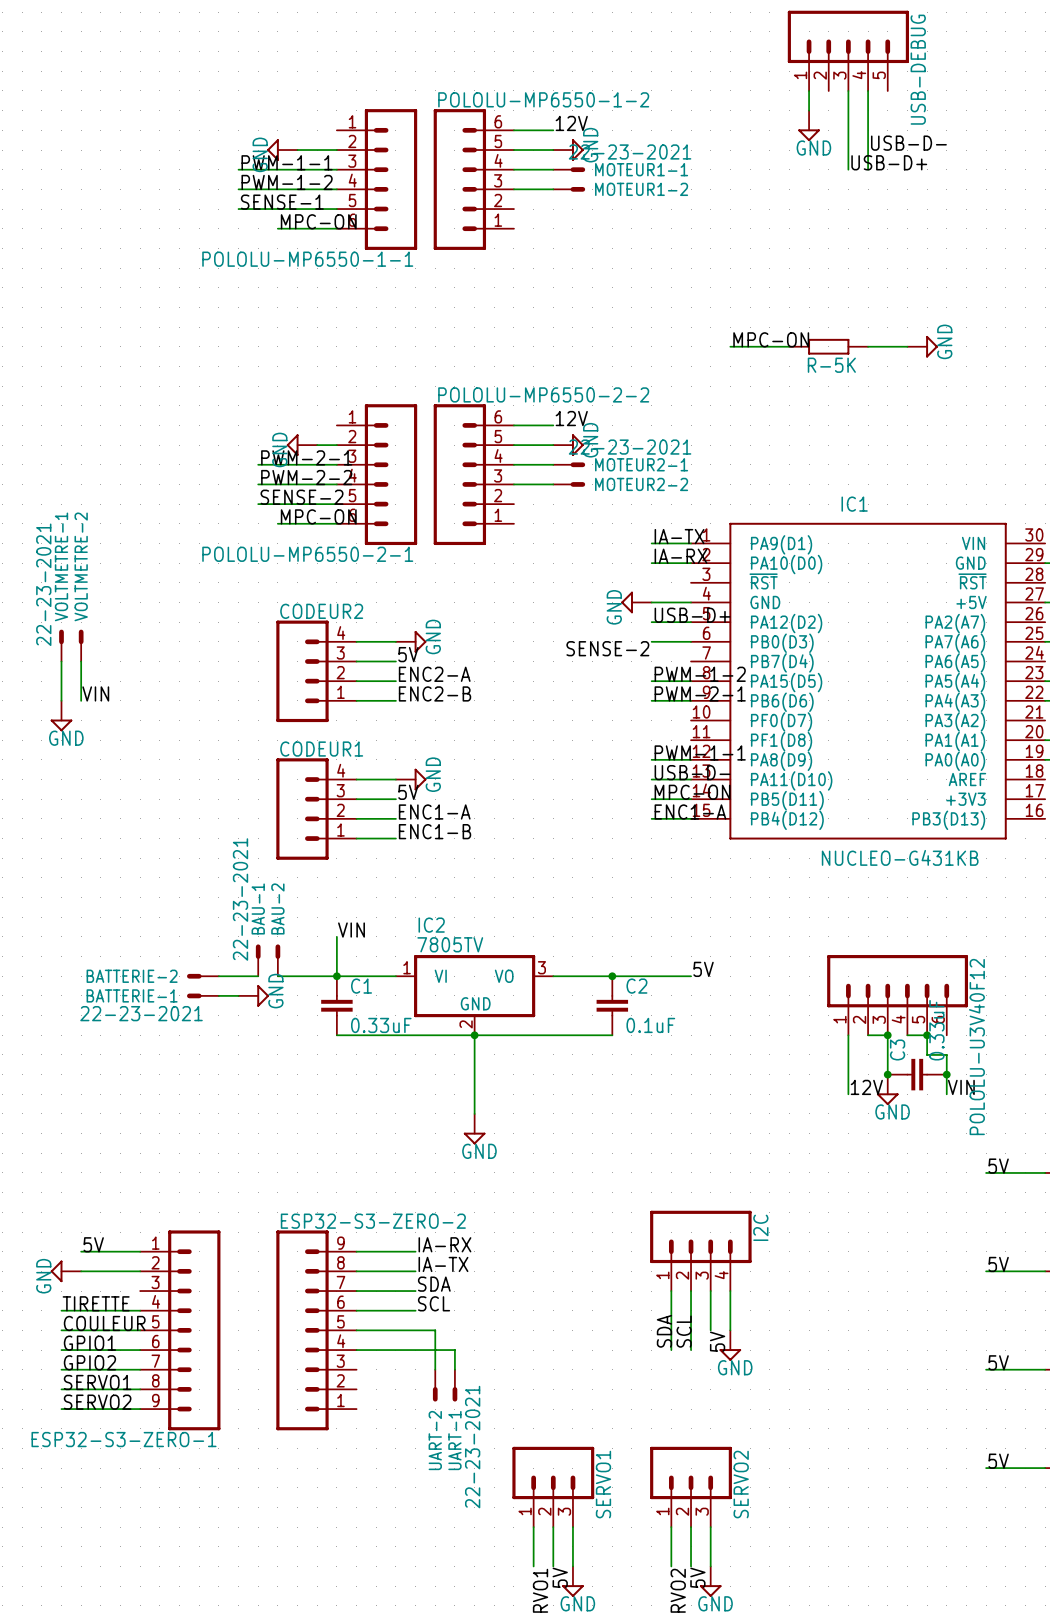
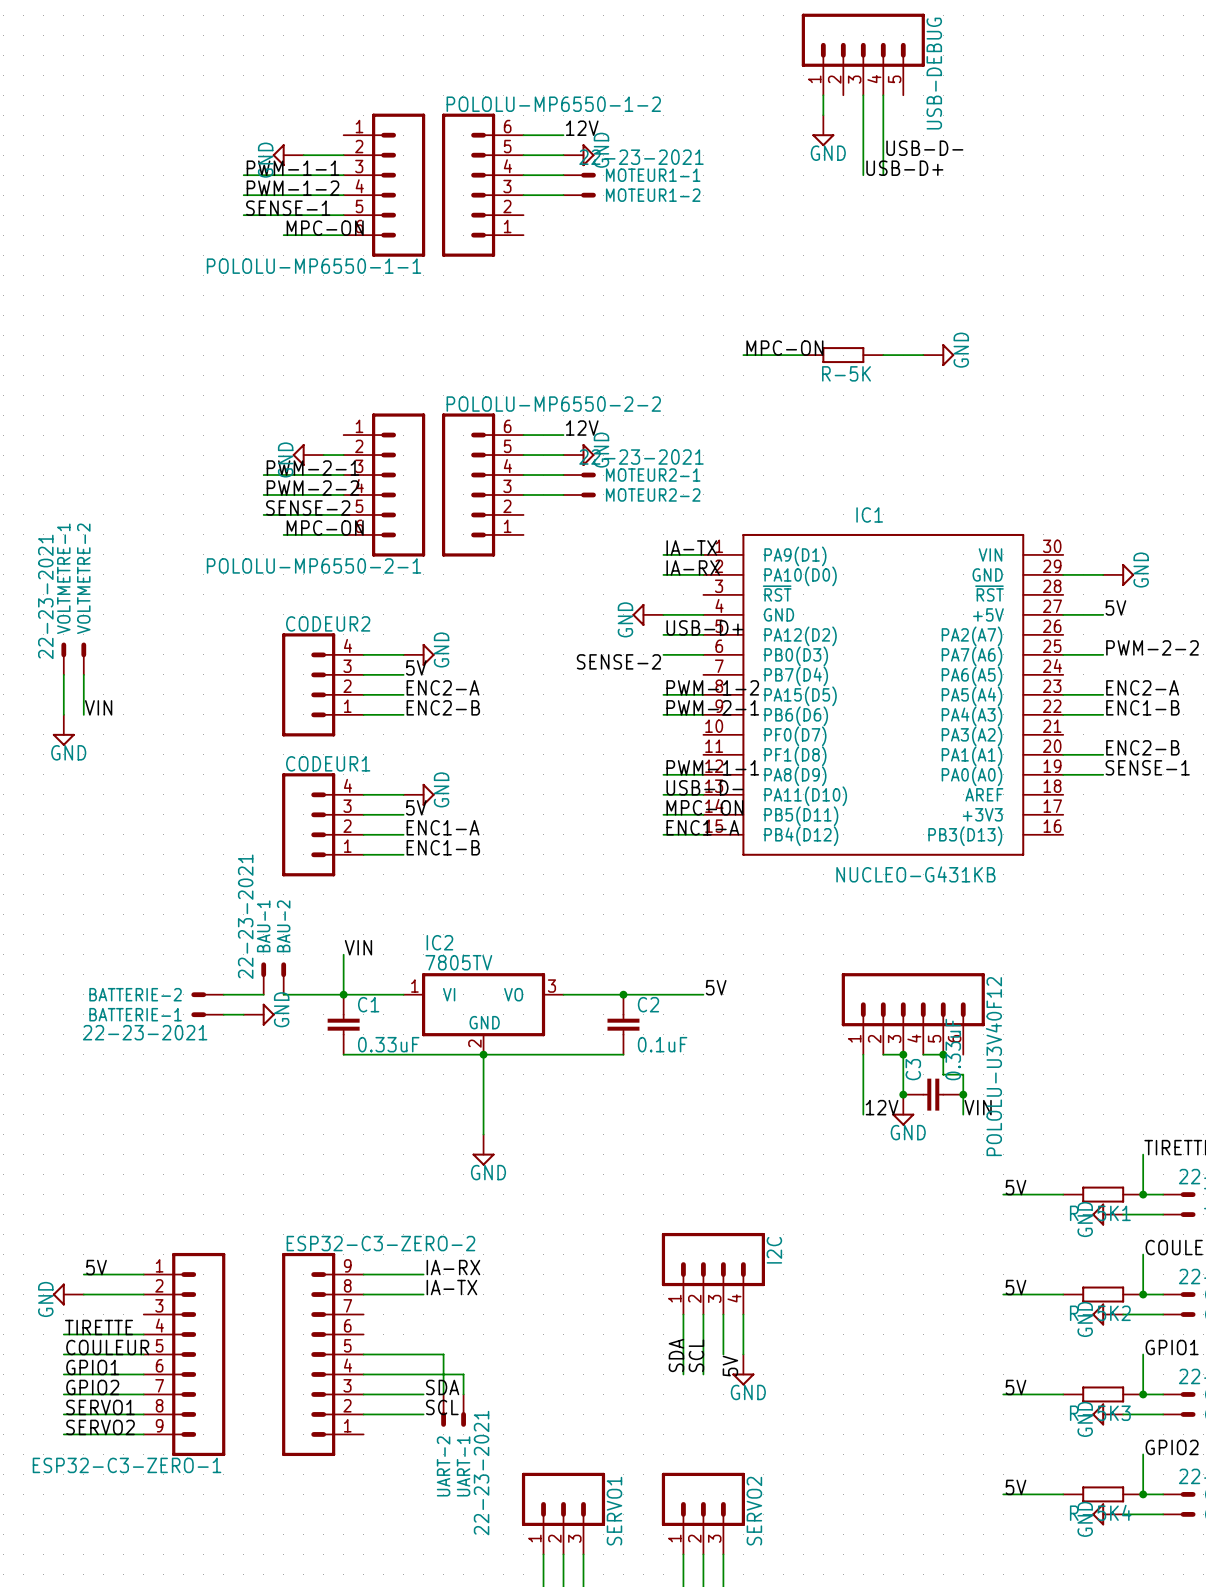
ESP32-S3-ZERO-2 name: ESP32-S3-ZERO-2 (373, 1221) -> ESP32-C3-ZERO-2 (380, 1243)
label position: SDA (434, 1284) -> SDA (442, 1387)
wire: (356, 1291) (415, 1291) -> (363, 1414) (423, 1414)
label position: SCL (434, 1303) -> SCL (442, 1407)
wire: (356, 1310) (415, 1310) -> (363, 1394) (423, 1394)
ESP32-S3-ZERO-1 name: ESP32-S3-ZERO-1 (124, 1439) -> ESP32-C3-ZERO-1 (127, 1465)

